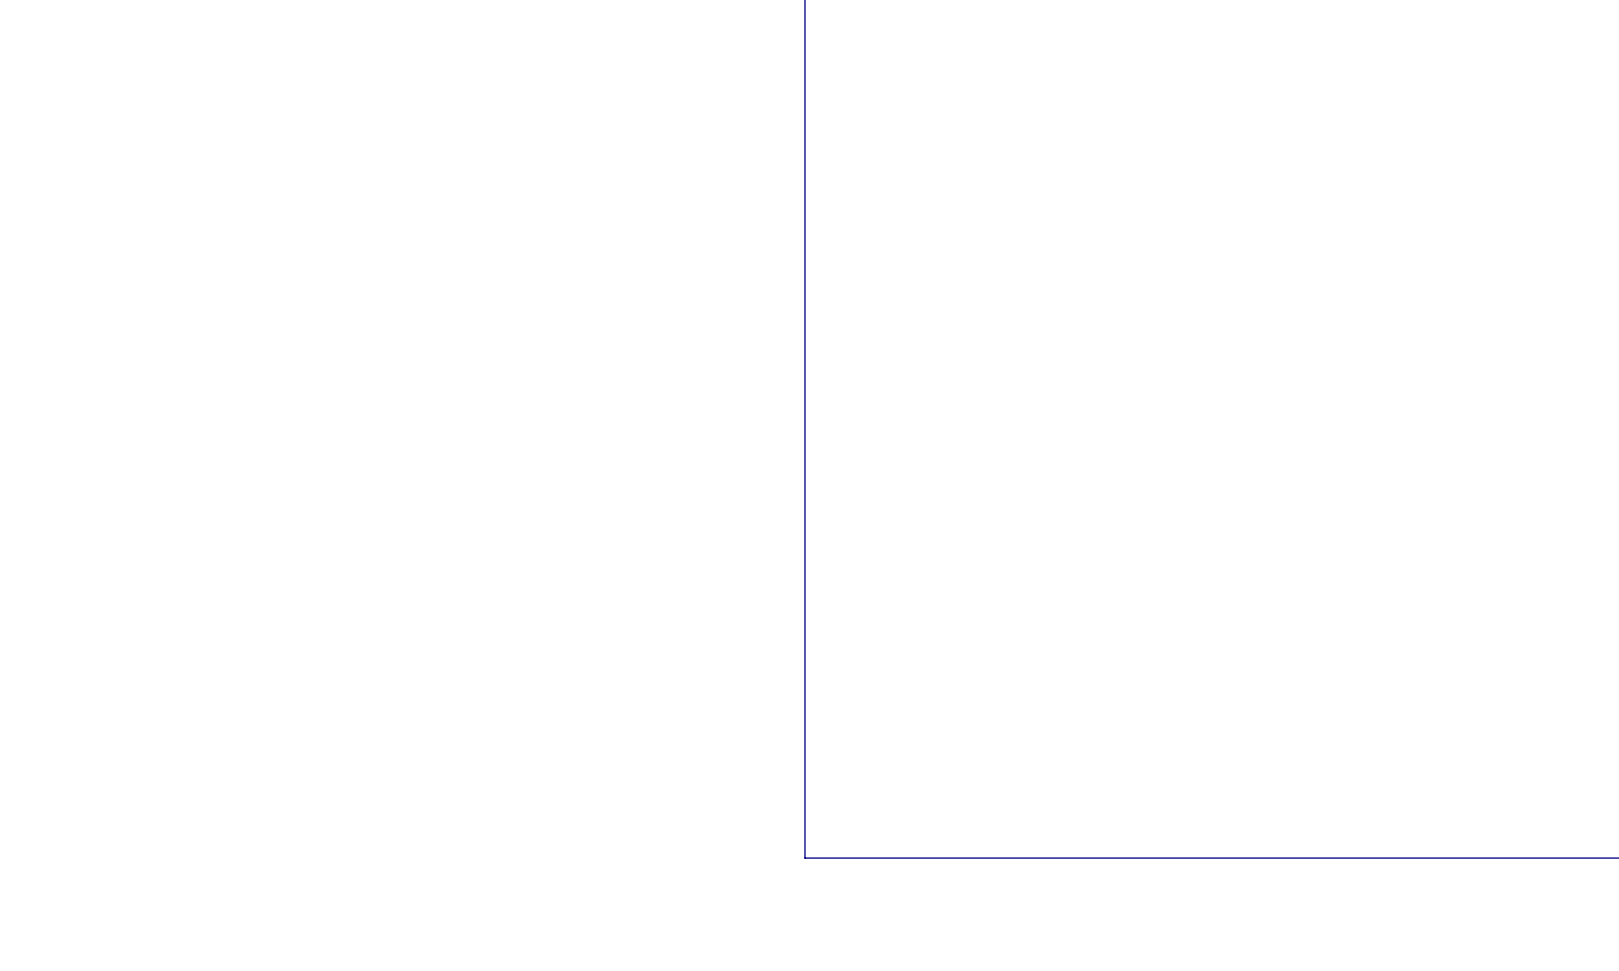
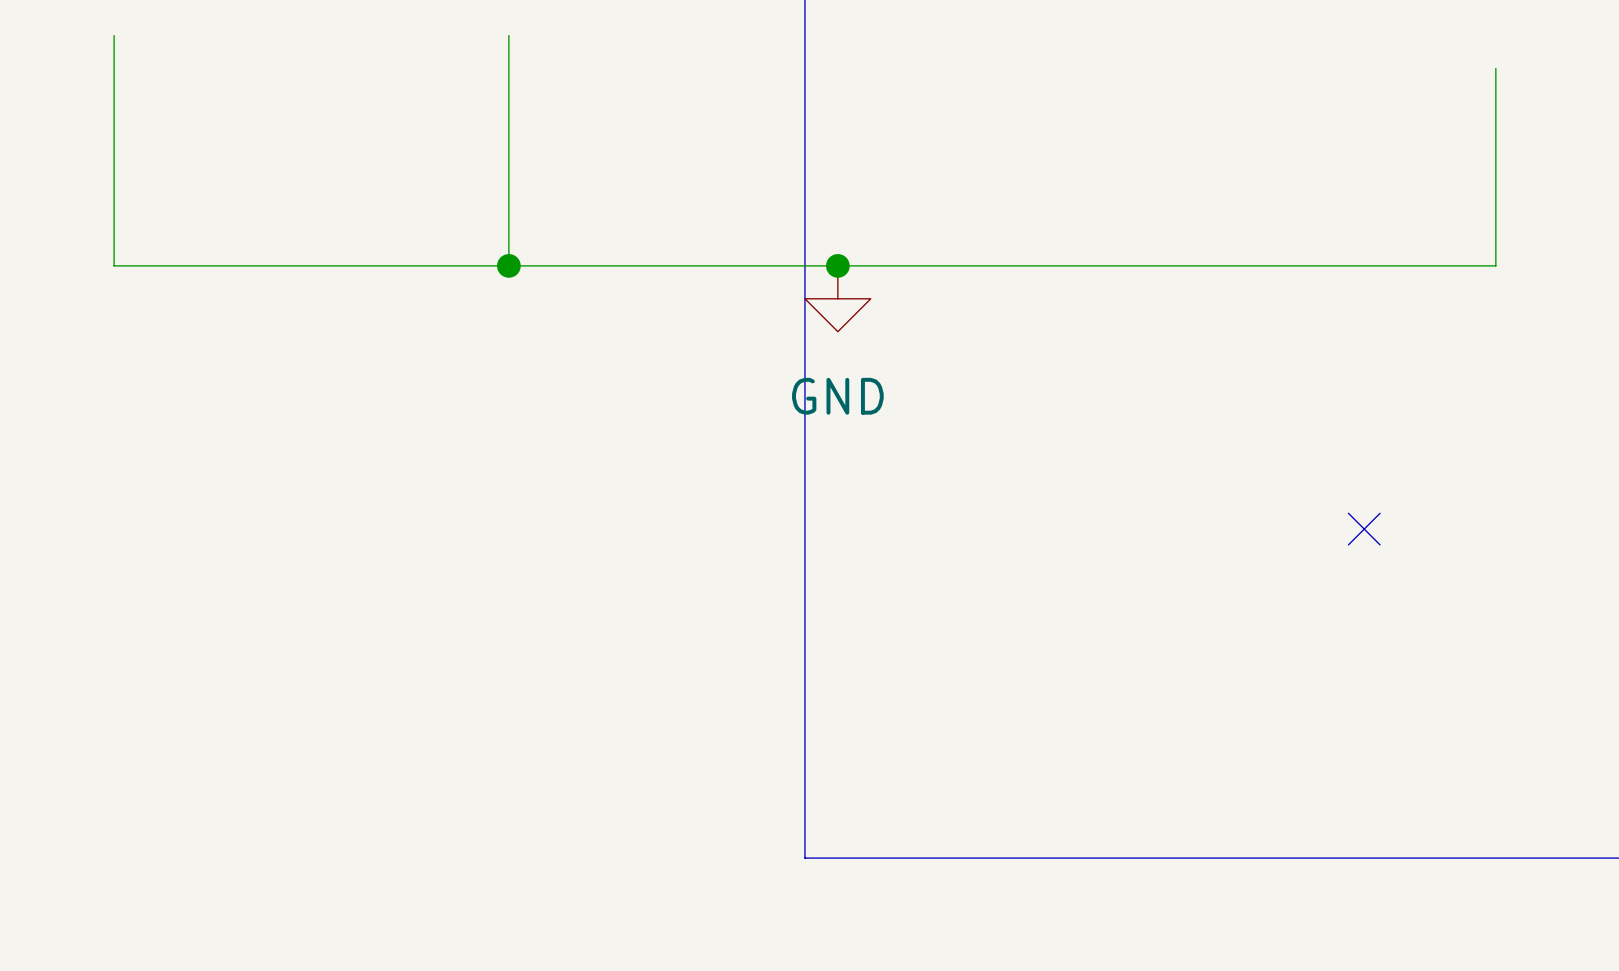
wire: none -> (114, 35) (114, 265) (1495, 265) (1495, 68)
wire: none -> (508, 35) (508, 265)
junction: none -> (508, 265)
junction: none -> (837, 265)
power symbol: none -> GND (837, 298)
no-connect mark: none -> (1364, 529)

